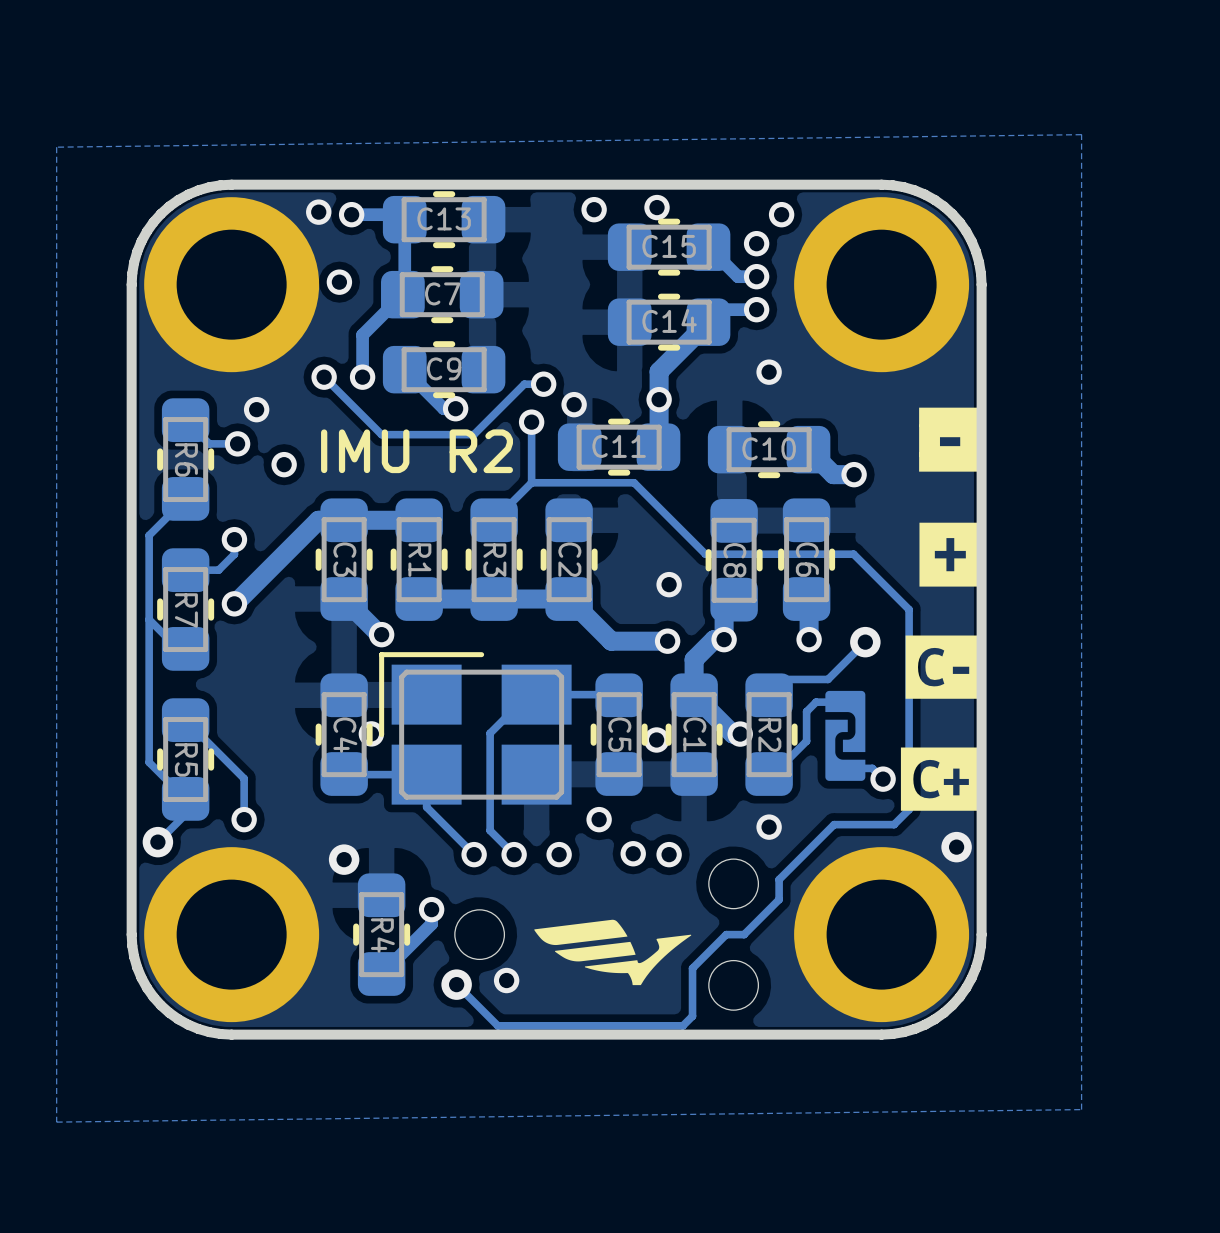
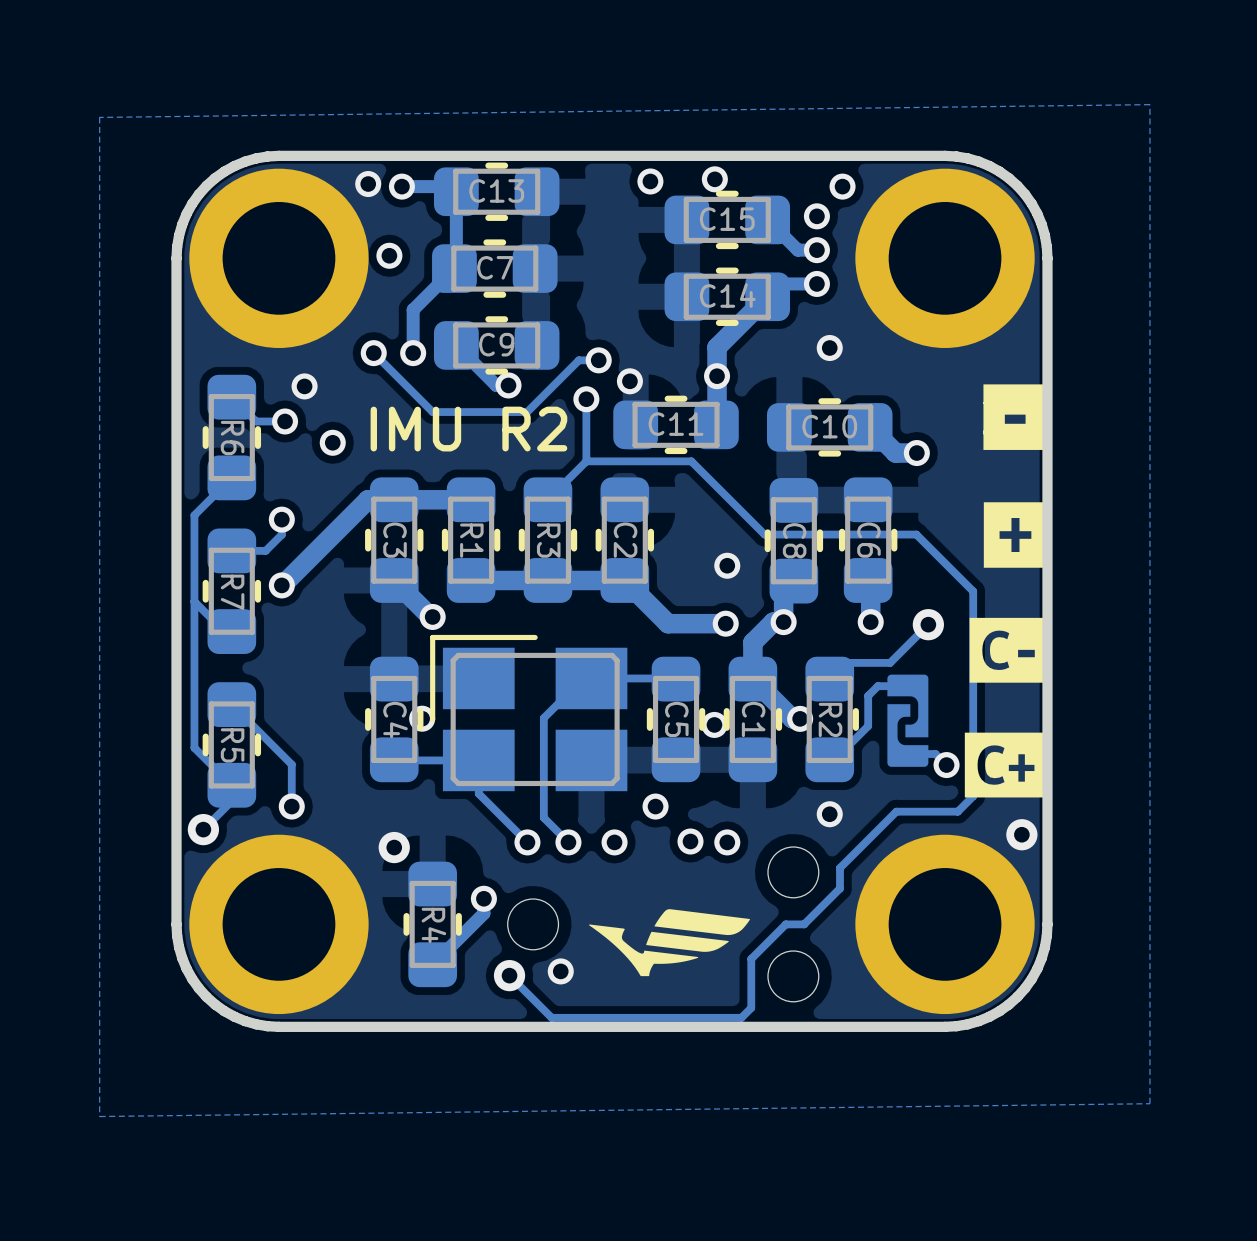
drawing: [534, 919, 628, 946] -> none
drawing: none -> [654, 909, 750, 936]
drawing shape: [584, 934, 692, 986] -> [646, 931, 729, 952]
drawing shape: [555, 941, 636, 962] -> [589, 924, 699, 977]

